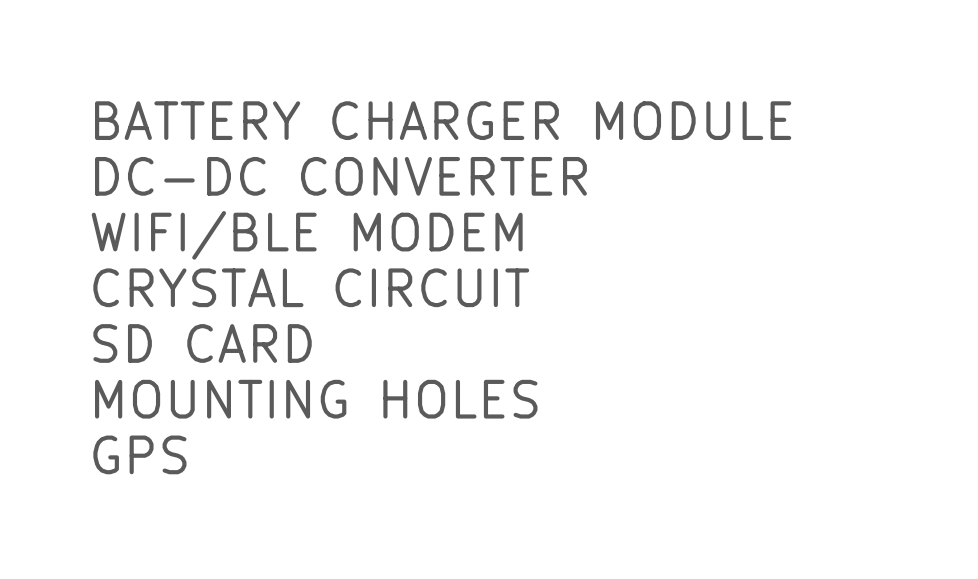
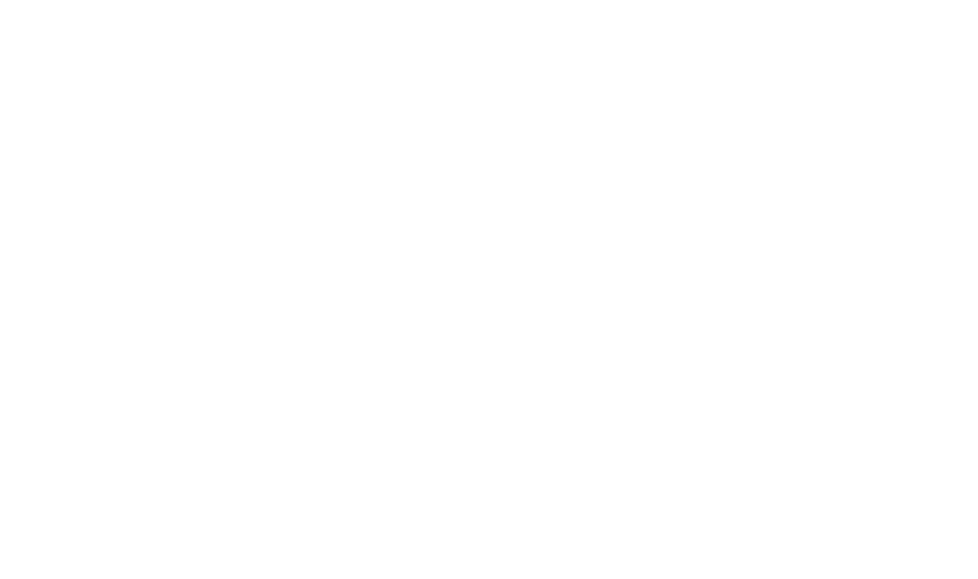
text: BATTERY CHARGER MODULE (443, 120) -> none
text: DC-DC CONVERTER (340, 176) -> none
text: WIFI/BLE MODEM (307, 235) -> none
text: CRYSTAL CIRCUIT (311, 287) -> none
text: SD CARD (202, 343) -> none
text: MOUNTING HOLES (316, 399) -> none
text: GPS (139, 454) -> none

